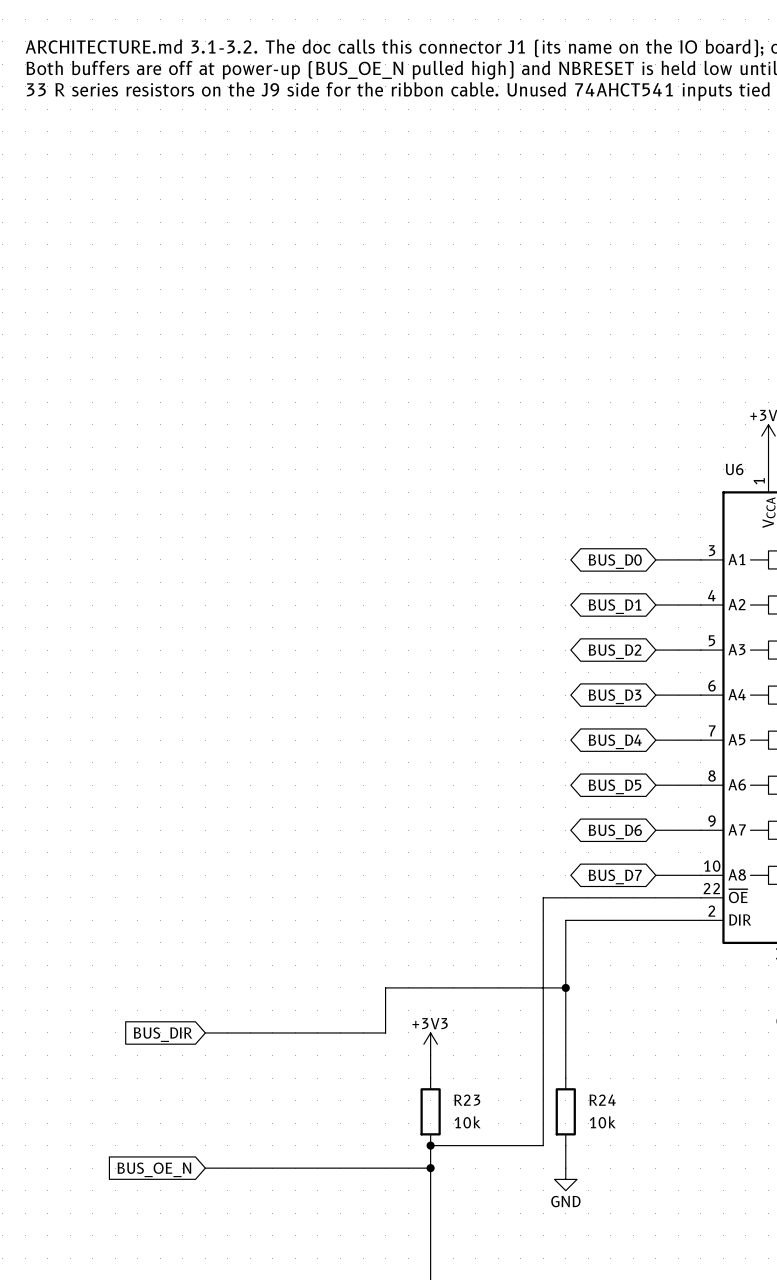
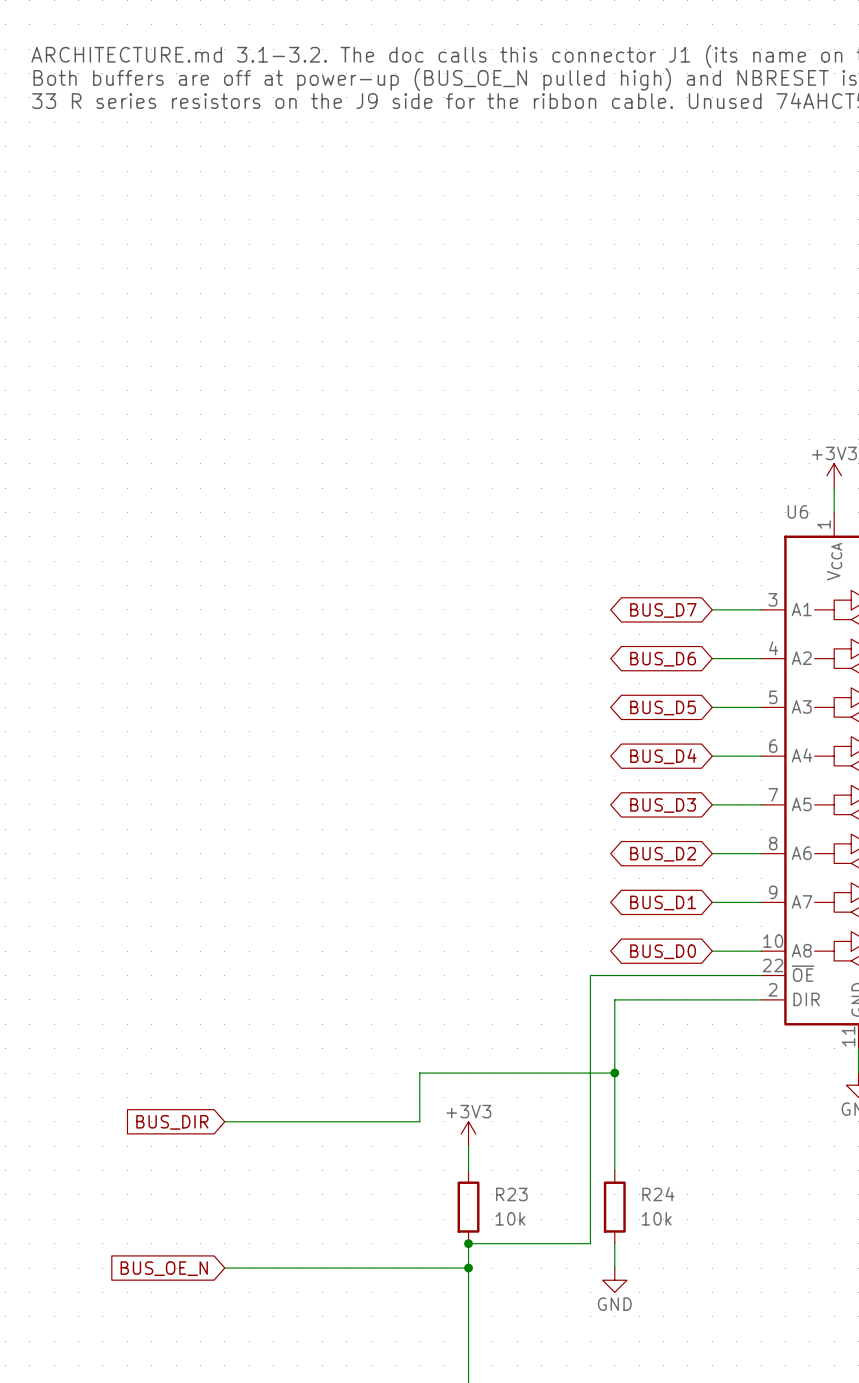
global label: BUS_D0 (615, 561) -> BUS_D7 (663, 610)
global label: BUS_D1 (615, 606) -> BUS_D6 (663, 659)
global label: BUS_D2 (615, 651) -> BUS_D5 (663, 707)
global label: BUS_D3 (615, 696) -> BUS_D4 (663, 756)
global label: BUS_D4 (615, 741) -> BUS_D3 (663, 805)
global label: BUS_D5 (615, 786) -> BUS_D2 (663, 854)
global label: BUS_D6 (615, 831) -> BUS_D1 (663, 902)
global label: BUS_D7 (615, 876) -> BUS_D0 (663, 951)

